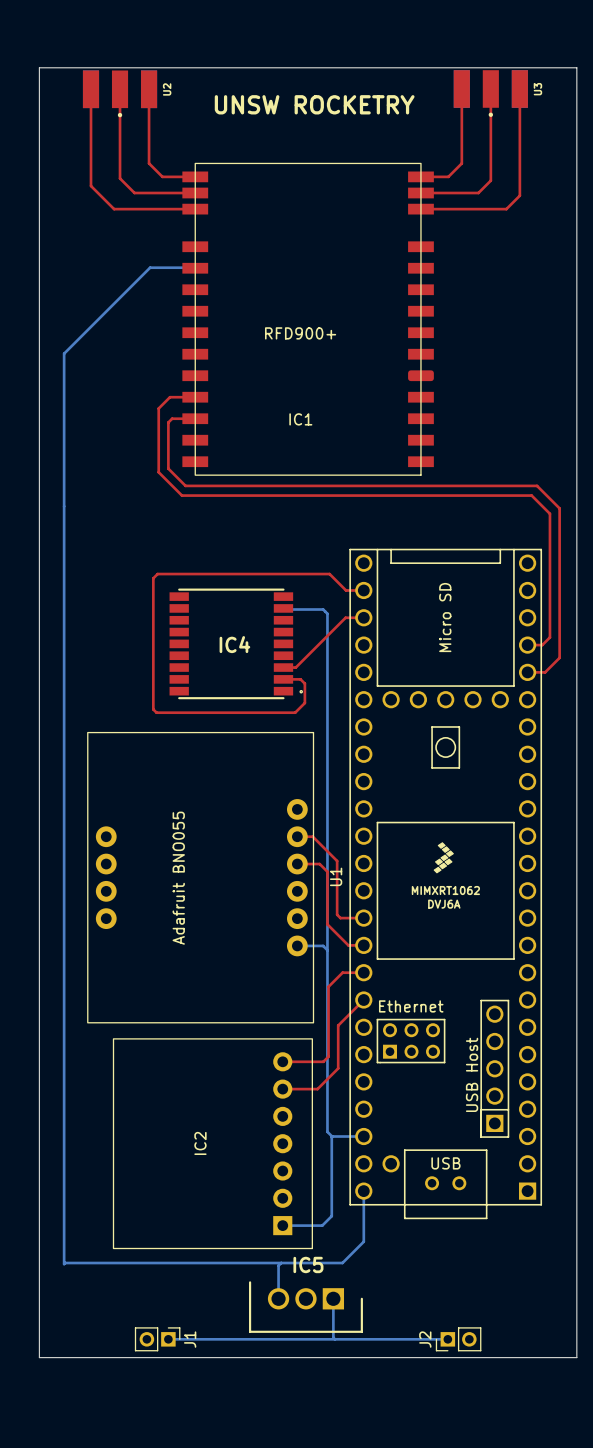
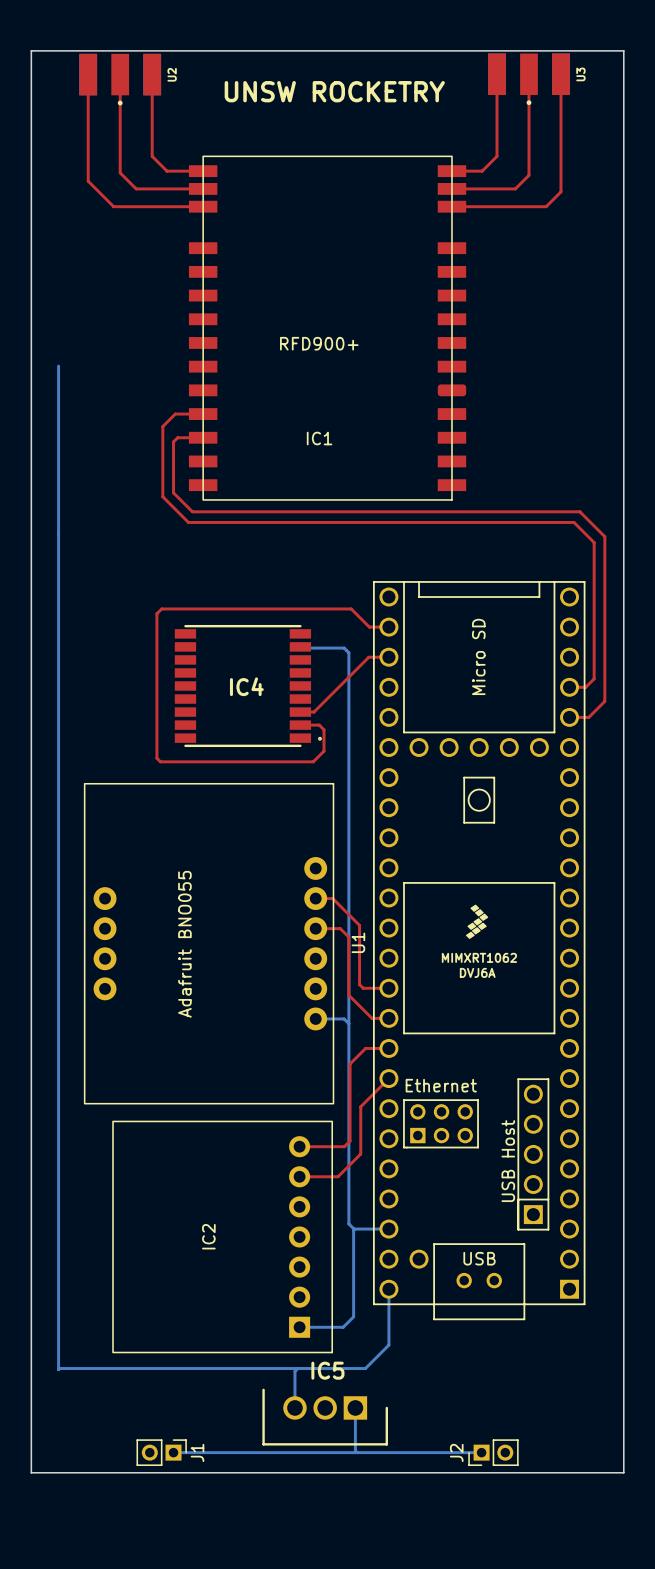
bottom track: (185, 267) (150, 267) (64, 353) -> none

